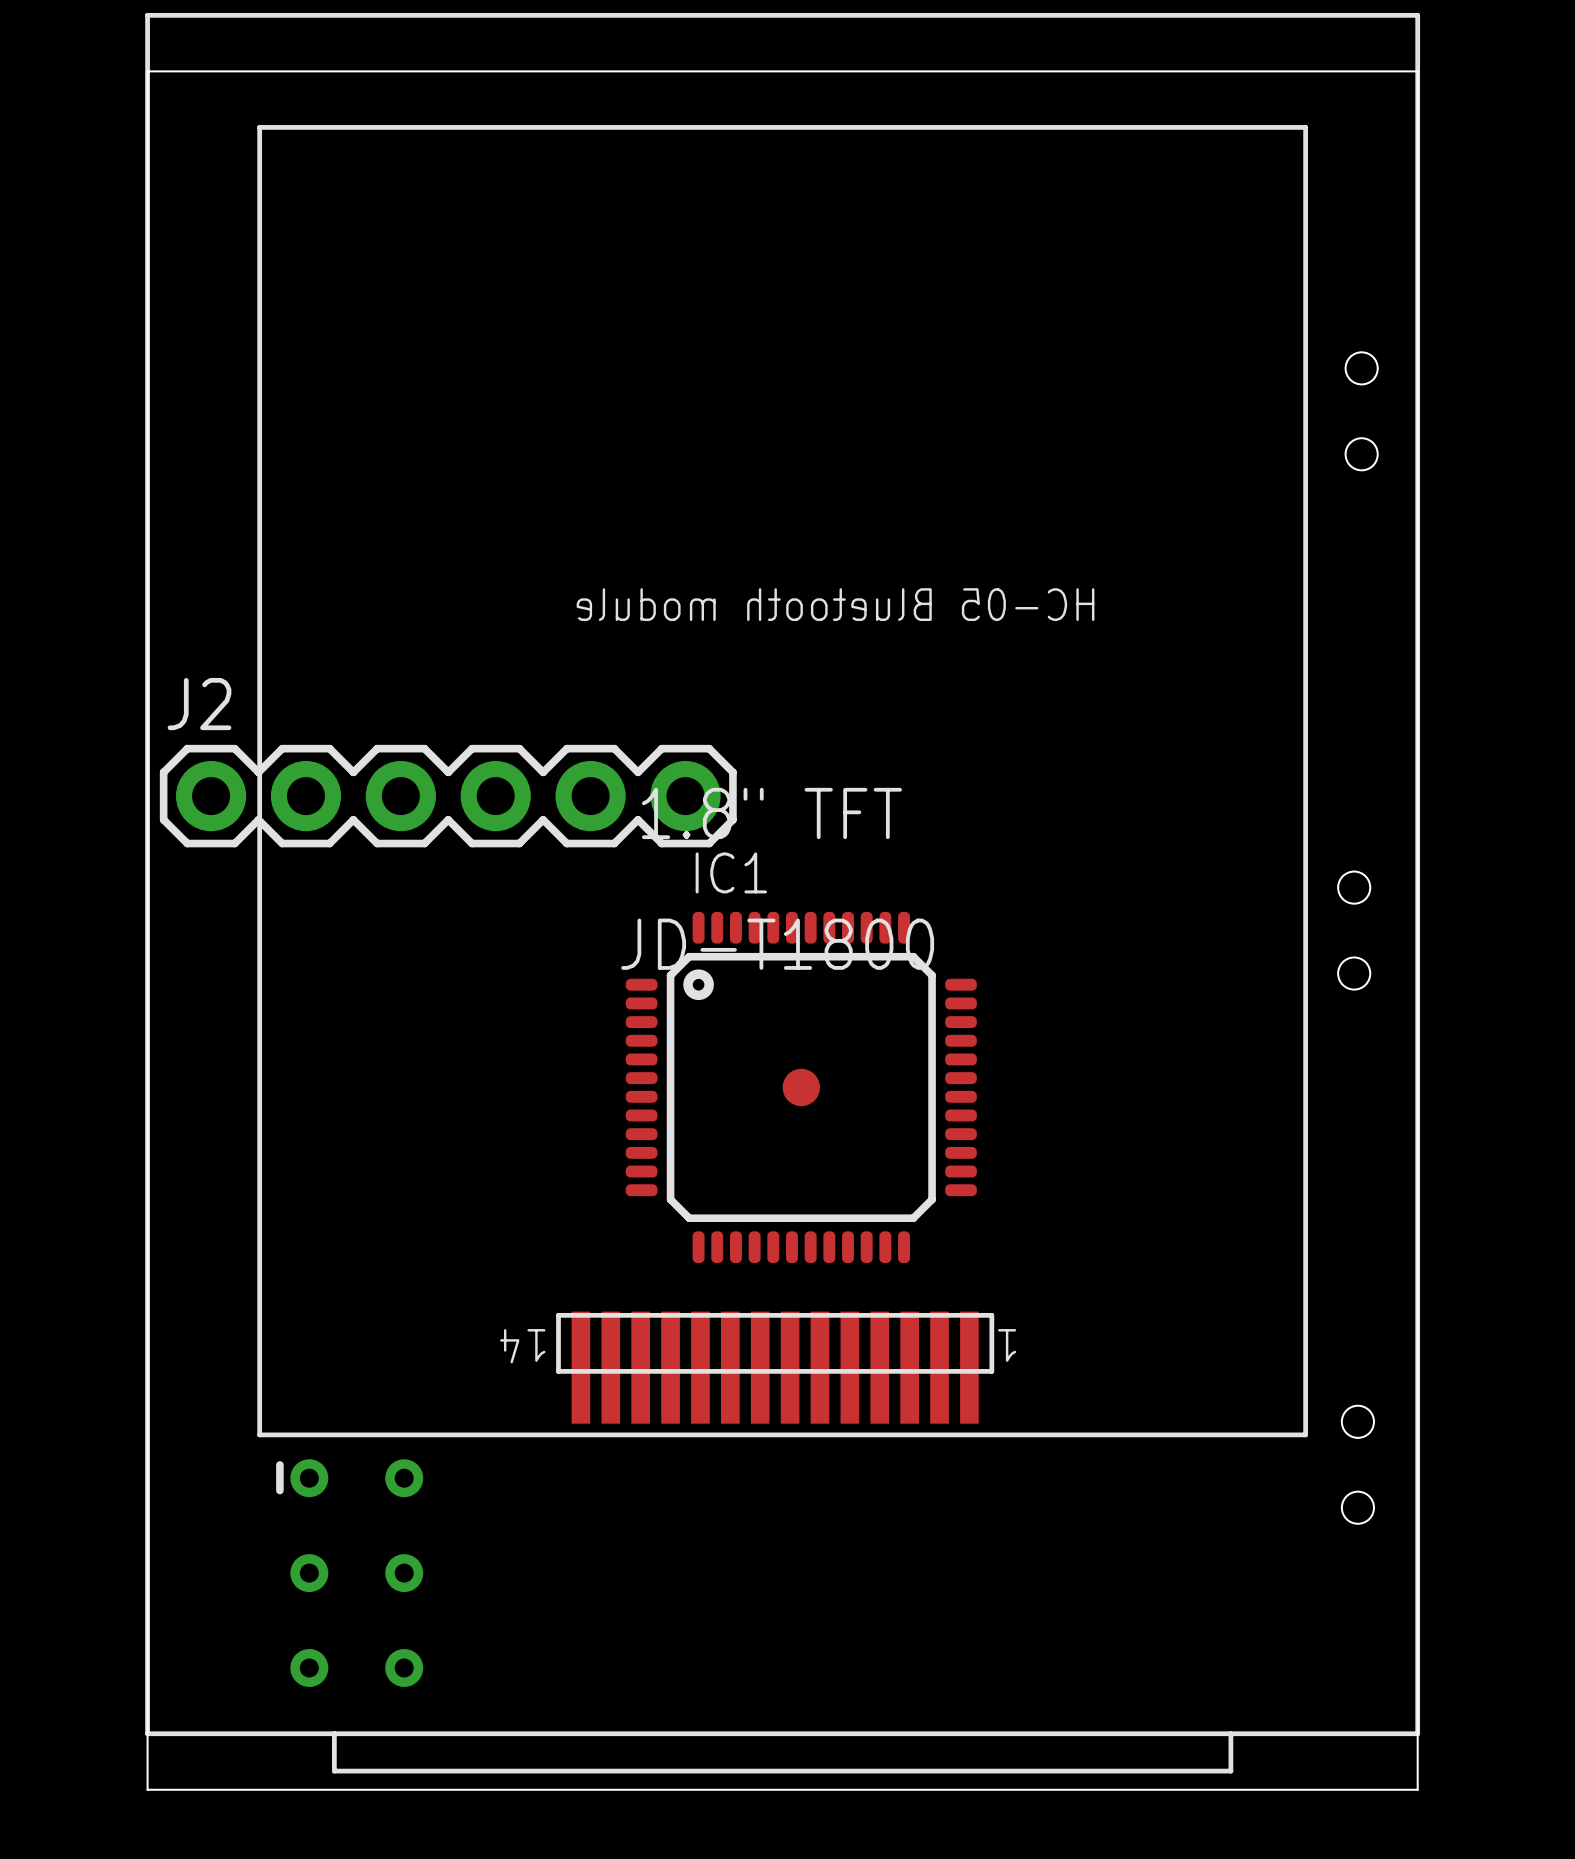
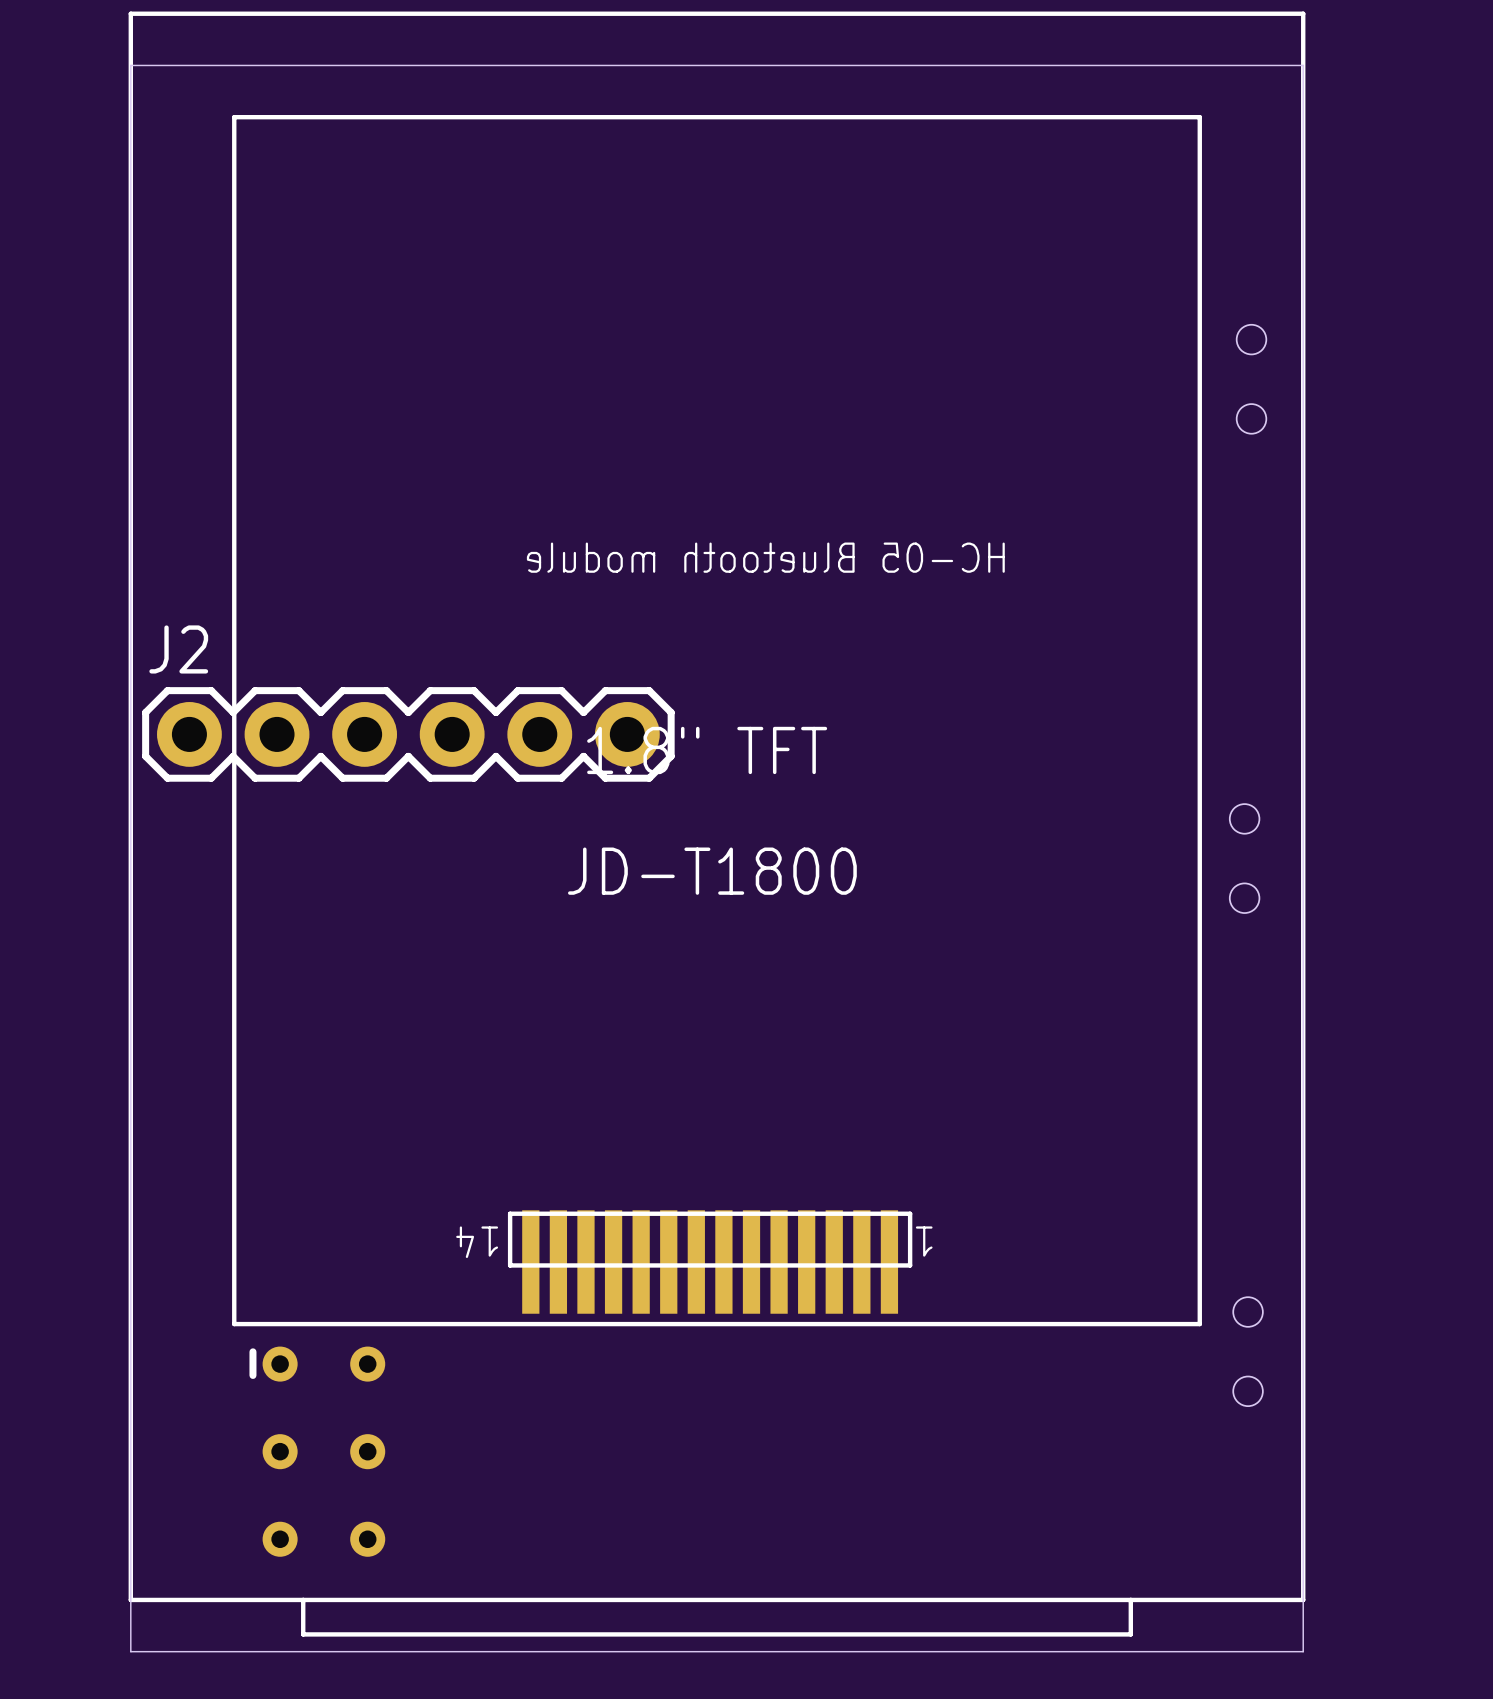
IC1: (801, 1087) -> none

